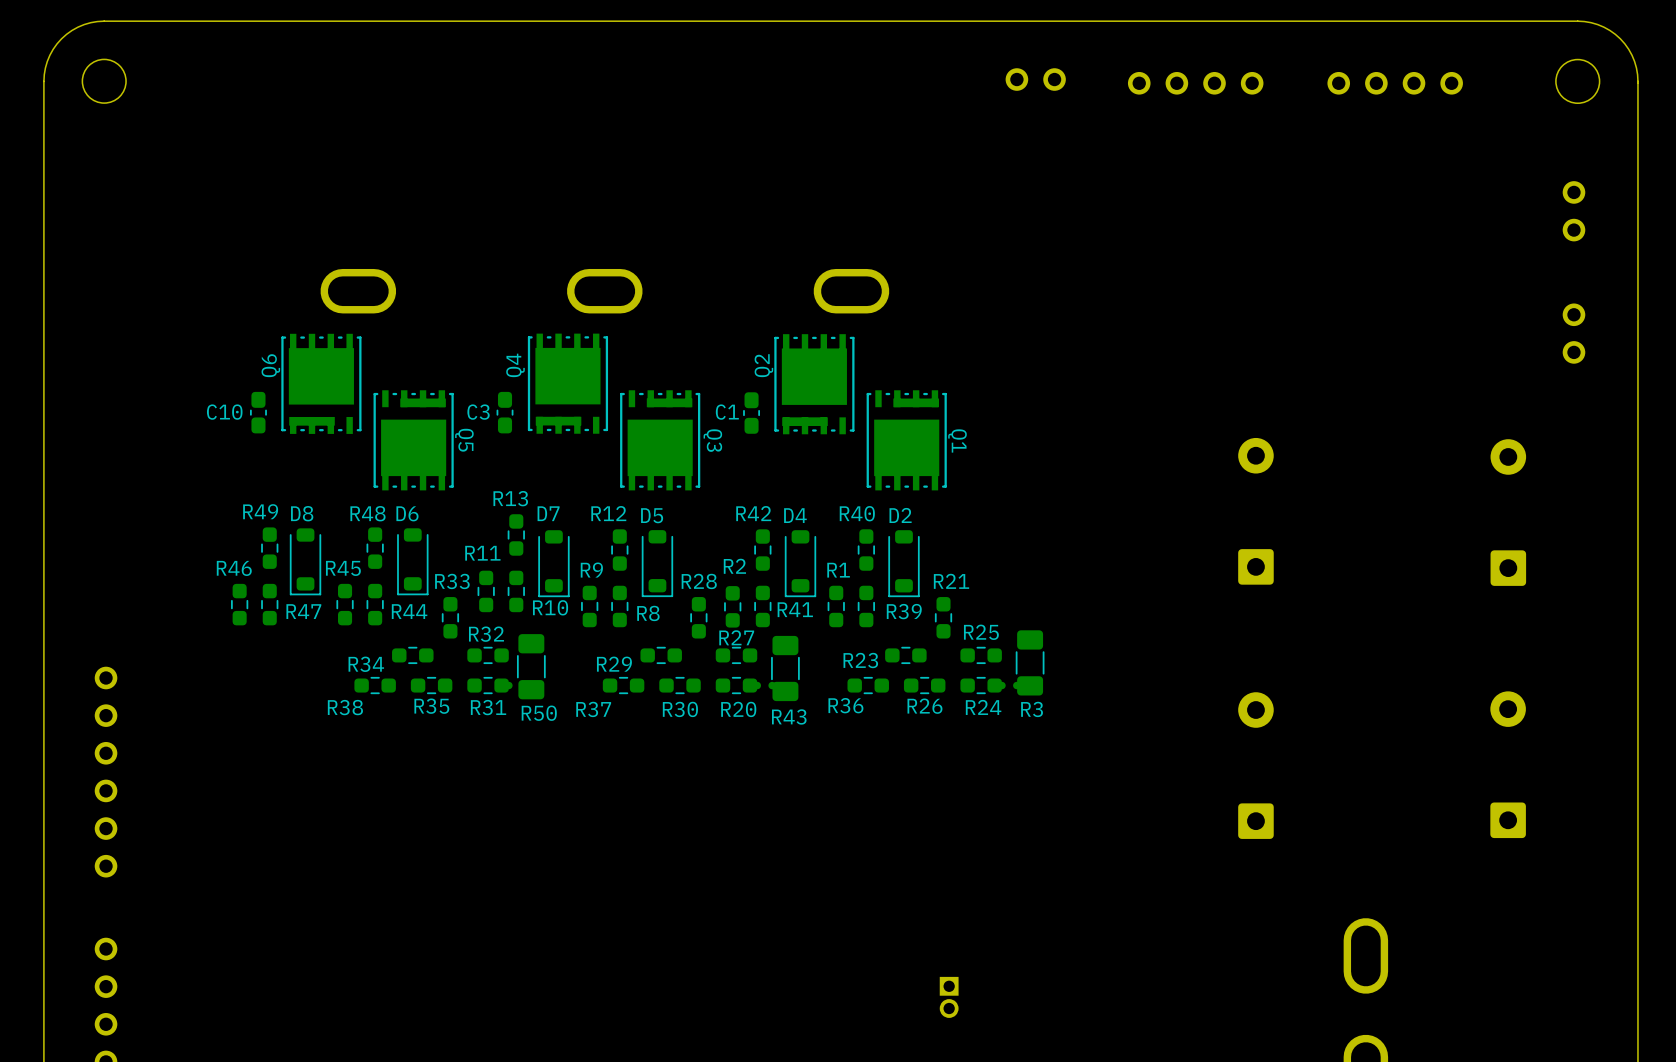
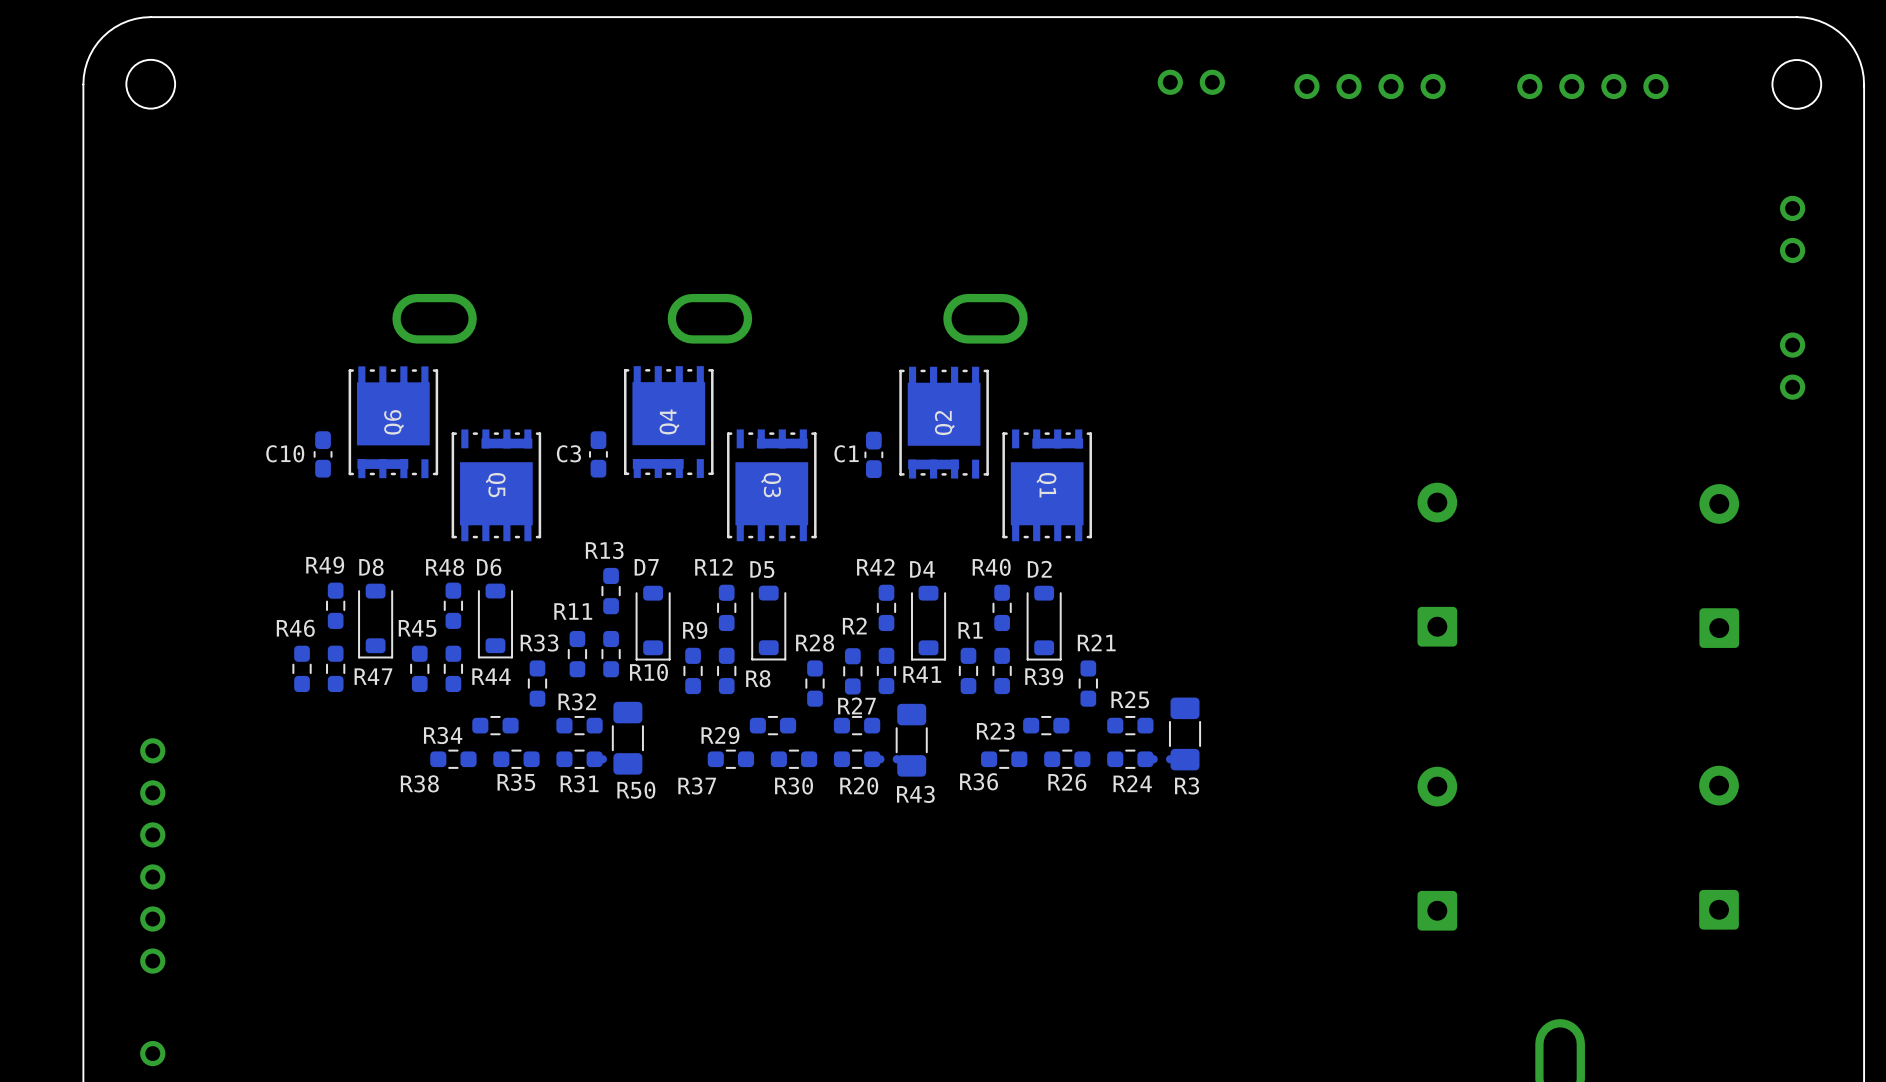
Q6 name position: Q6 (270, 365) -> Q6 (394, 422)
Q4 name position: Q4 (515, 365) -> Q4 (669, 421)
Q2 name position: Q2 (763, 365) -> Q2 (944, 422)
Q5 name position: Q5 (464, 440) -> Q5 (495, 485)
Q3 name position: Q3 (712, 440) -> Q3 (771, 485)
Q1 name position: Q1 (957, 440) -> Q1 (1046, 485)

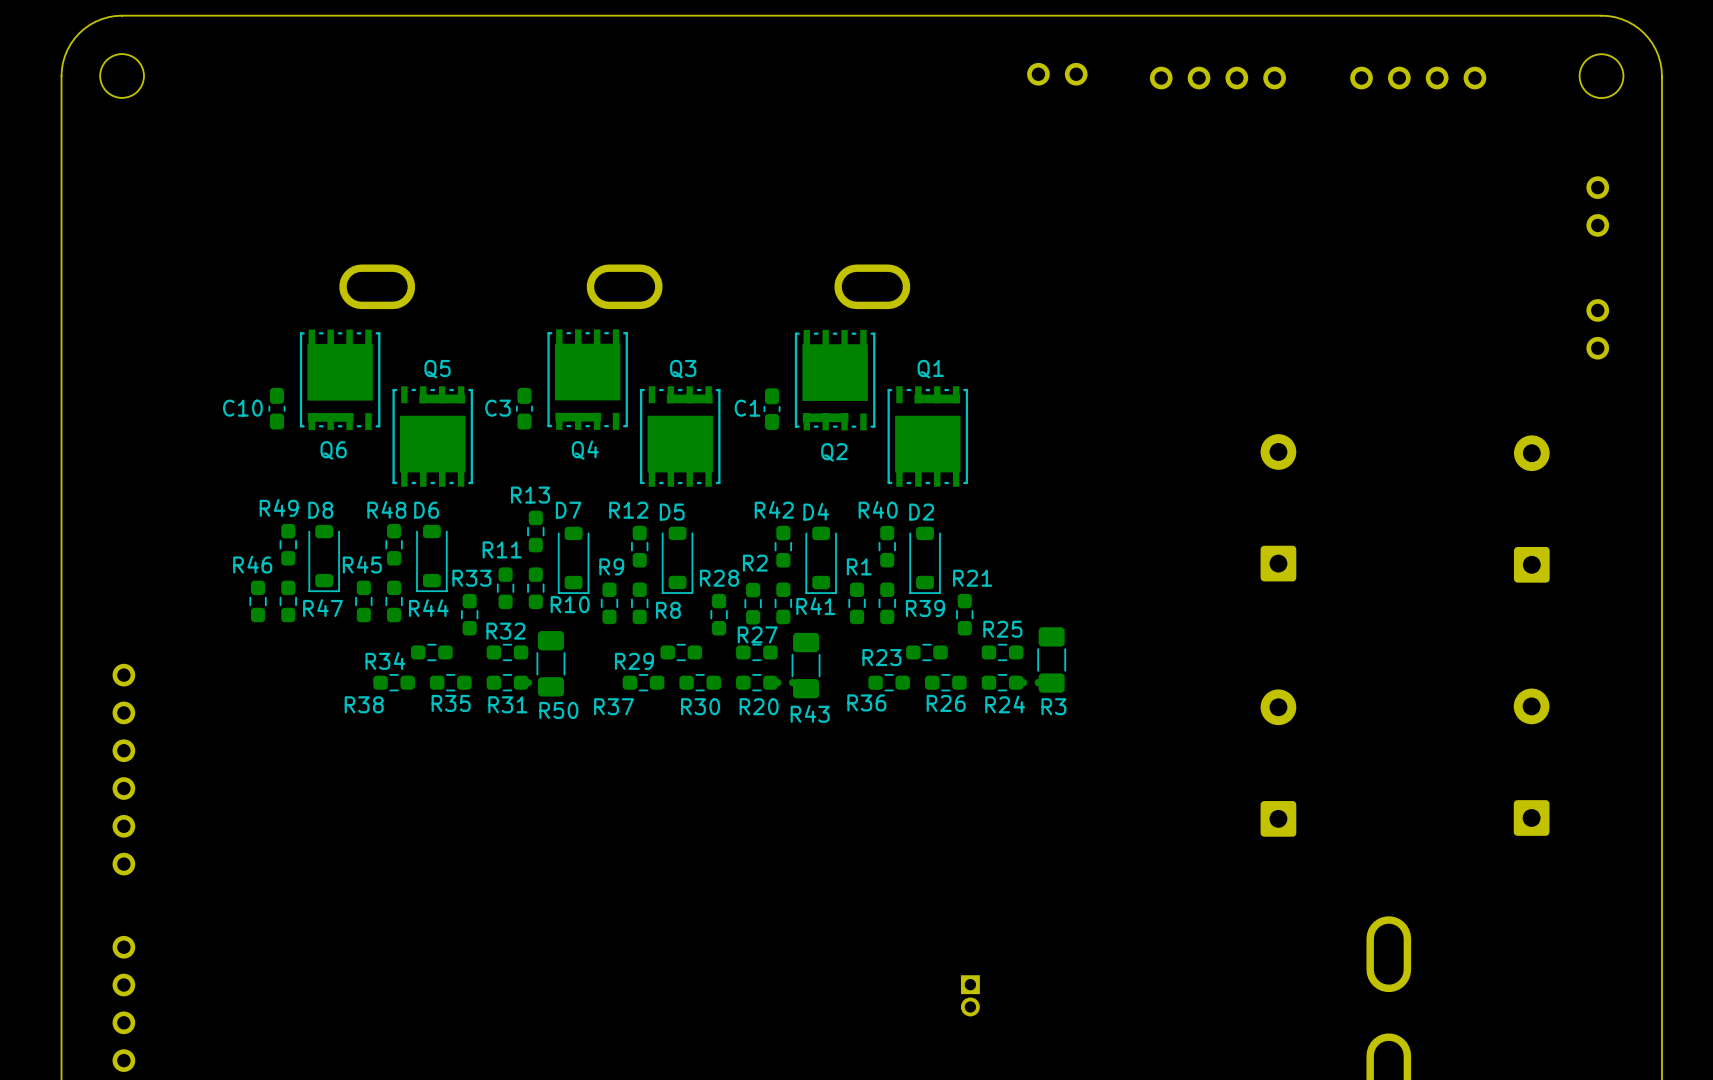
Q4 name rotation: 0° (669, 421) -> 90° clockwise (585, 450)
Q4 name position: Q4 (669, 421) -> Q4 (585, 450)
Q6 name rotation: 0° (394, 422) -> 90° clockwise (333, 450)
Q6 name position: Q6 (394, 422) -> Q6 (333, 450)
Q2 name rotation: 0° (944, 422) -> 90° clockwise (834, 452)
Q2 name position: Q2 (944, 422) -> Q2 (834, 452)
Q5 name rotation: 0° (495, 485) -> 90° counterclockwise (437, 369)
Q5 name position: Q5 (495, 485) -> Q5 (437, 369)
Q3 name rotation: 0° (771, 485) -> 90° counterclockwise (683, 369)
Q3 name position: Q3 (771, 485) -> Q3 (683, 369)
Q1 name rotation: 0° (1046, 485) -> 90° counterclockwise (930, 369)
Q1 name position: Q1 (1046, 485) -> Q1 (930, 369)

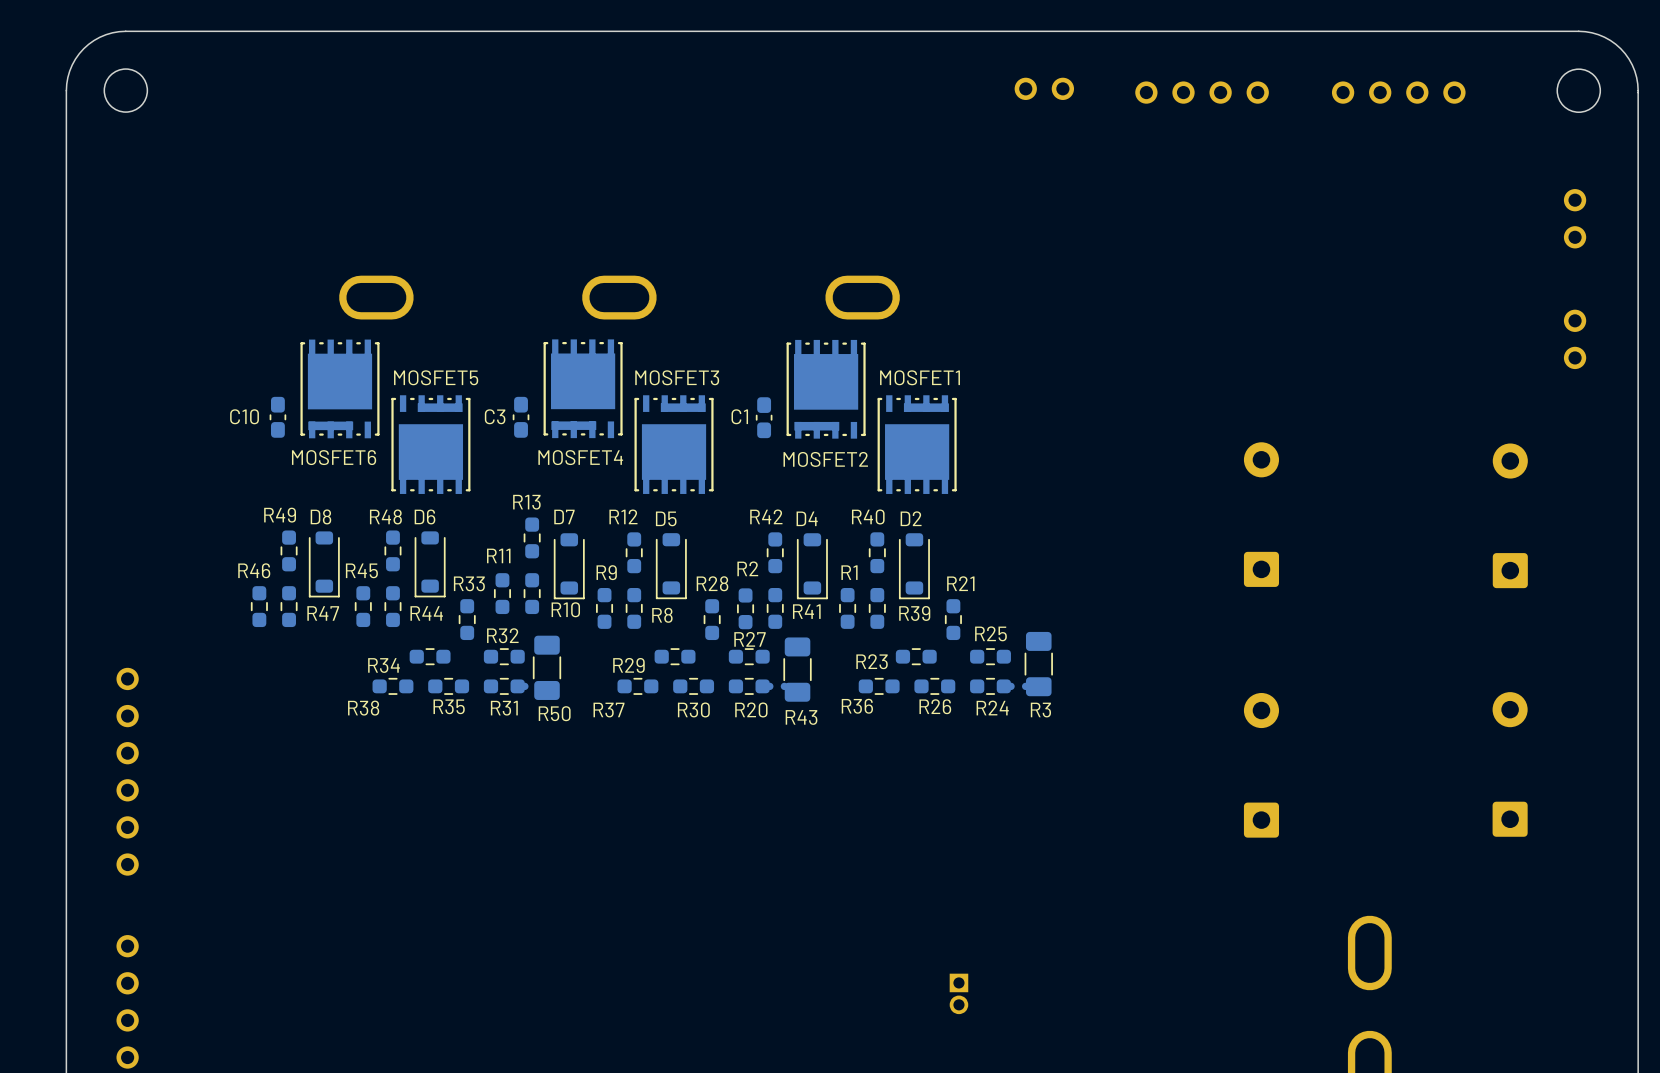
Q5 name: Q5 (437, 369) -> MOSFET5 (436, 377)
Q3 name: Q3 (683, 369) -> MOSFET3 (677, 377)
Q1 name: Q1 (930, 369) -> MOSFET1 (920, 377)
Q6 name: Q6 (333, 450) -> MOSFET6 (334, 457)
Q4 name: Q4 (585, 450) -> MOSFET4 (580, 457)
Q2 name: Q2 (834, 452) -> MOSFET2 (825, 459)

